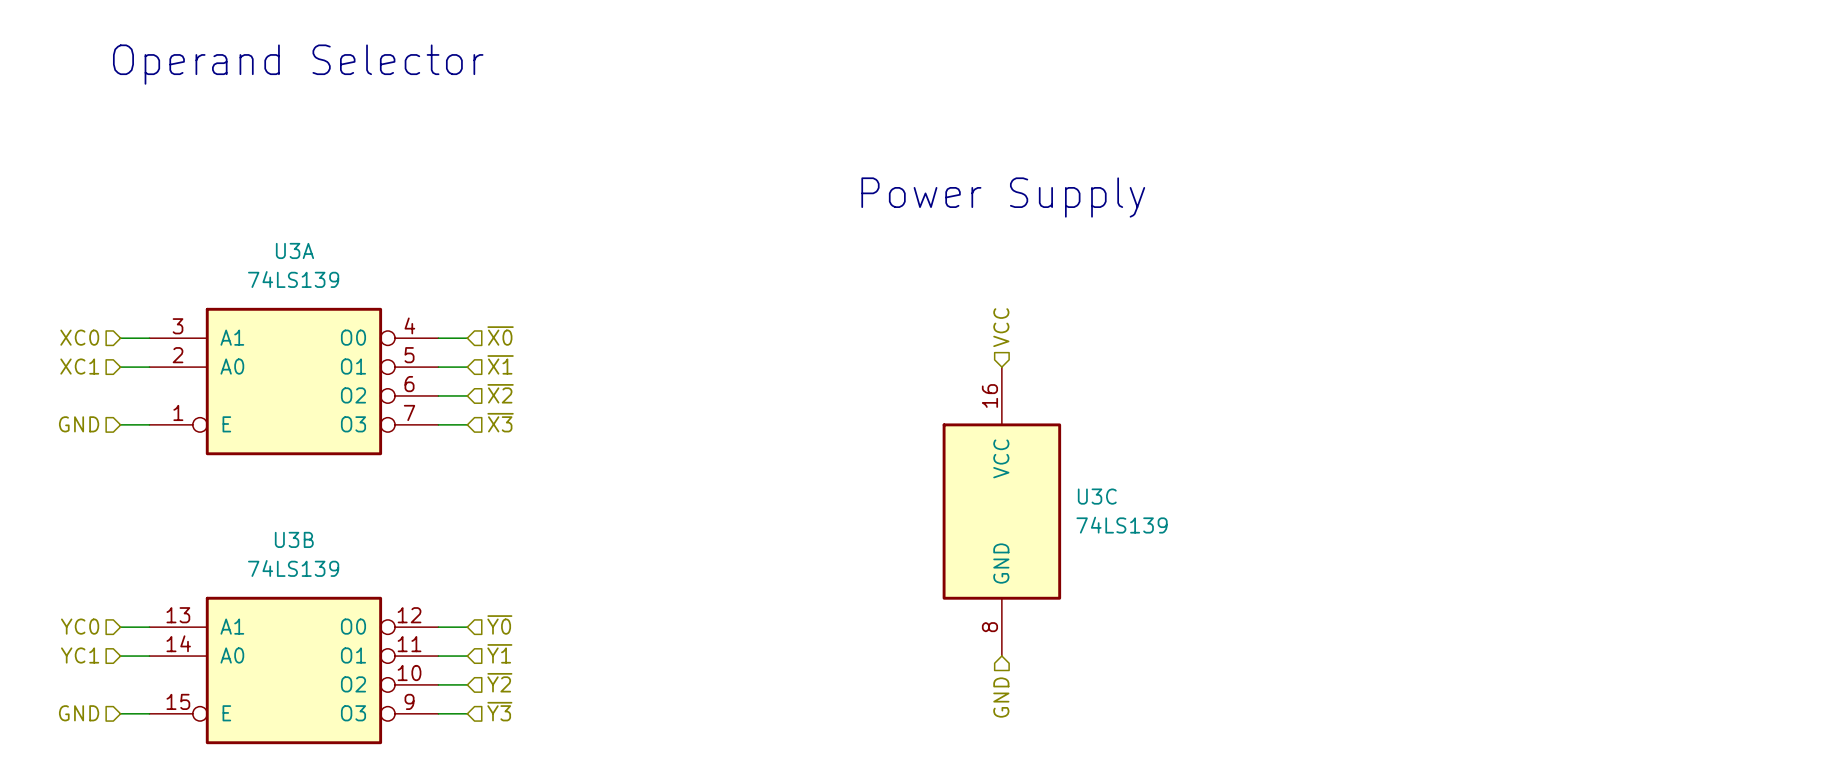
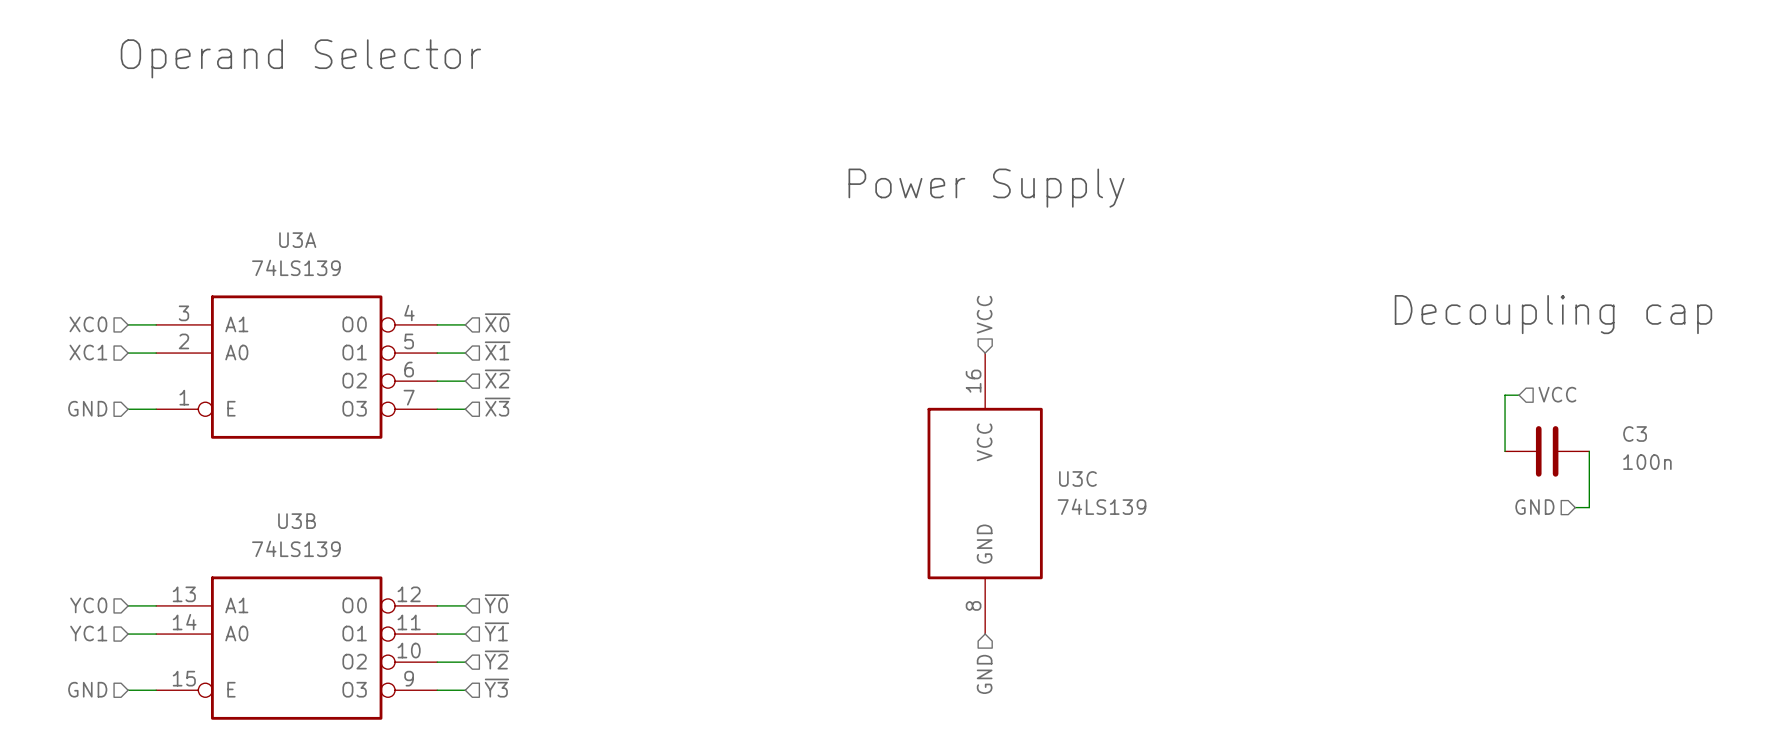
text: none -> Decoupling cap (1553, 314)
hierarchical label: none -> VCC (1557, 394)
wire: none -> (1519, 395) (1505, 395) (1505, 451)
C3: none -> 100n (1547, 451)
wire: none -> (1589, 451) (1589, 507) (1575, 507)
hierarchical label: none -> GND (1534, 507)

